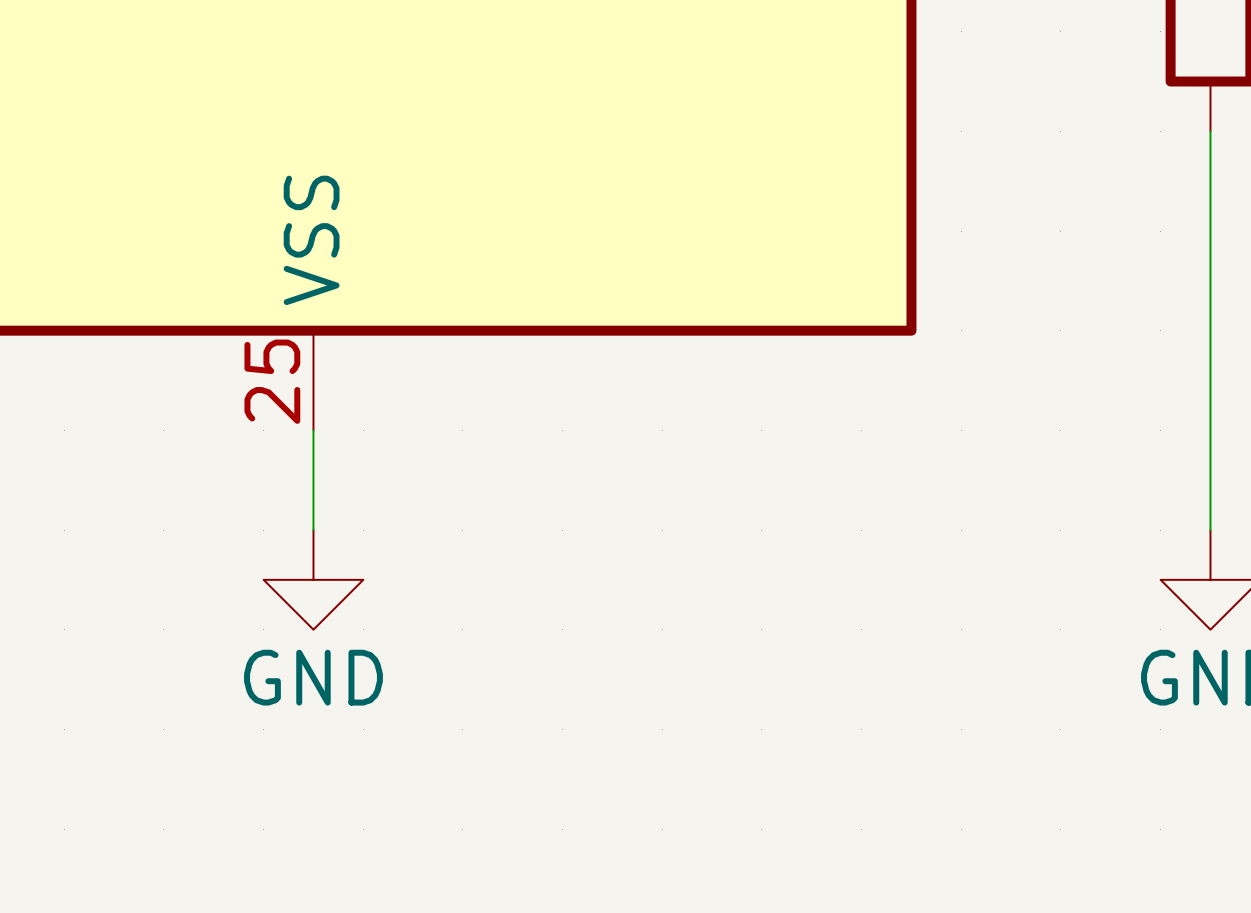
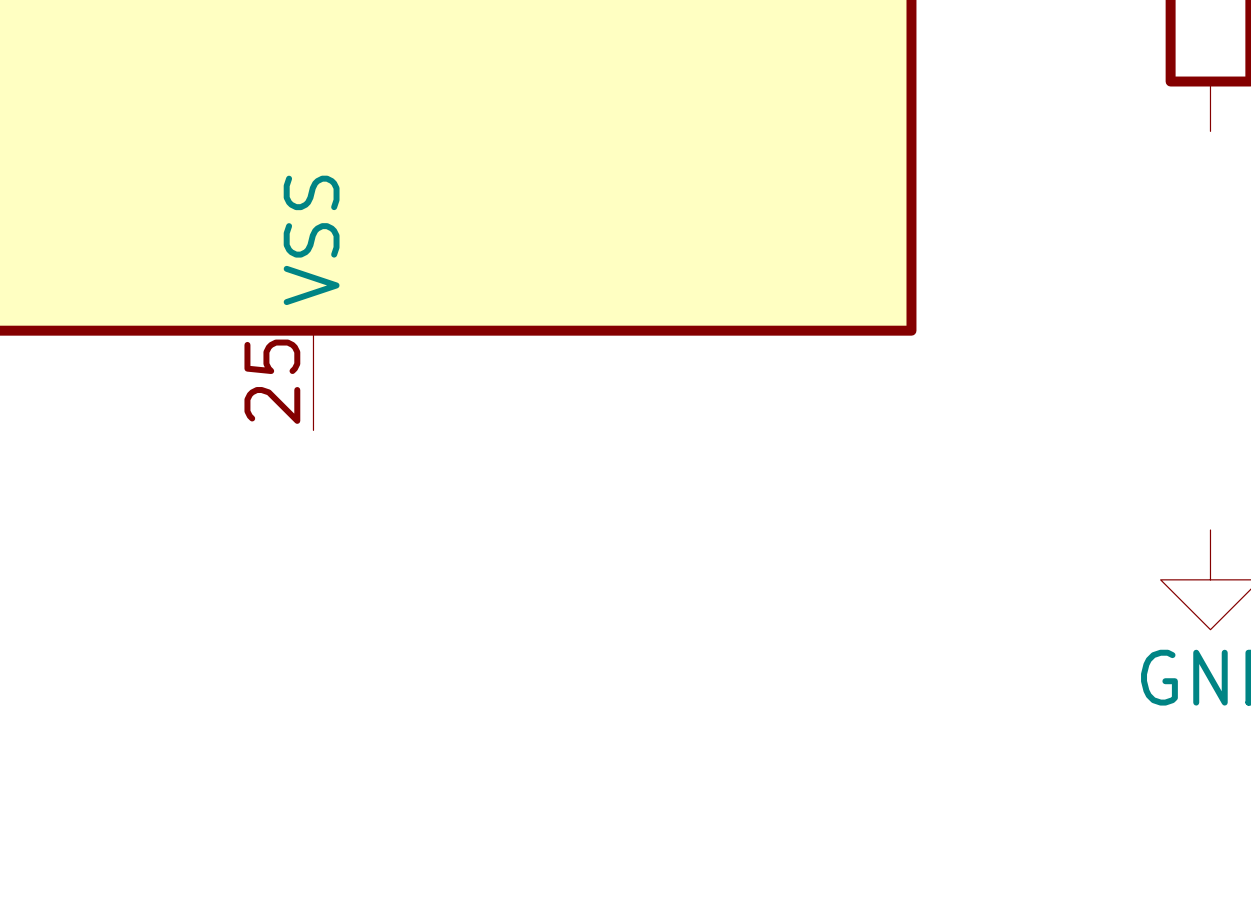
wire: (1210, 131) (1210, 530) -> none
wire: (313, 430) (313, 530) -> none
power symbol: GND (313, 579) -> none

